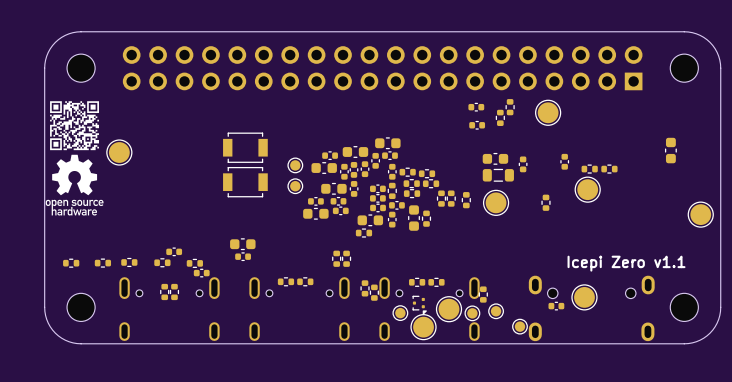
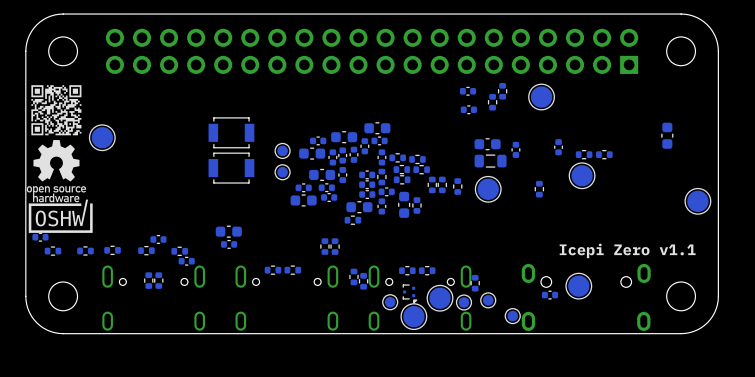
drawing: none -> [28, 199, 93, 233]
part: none -> (40, 237)

